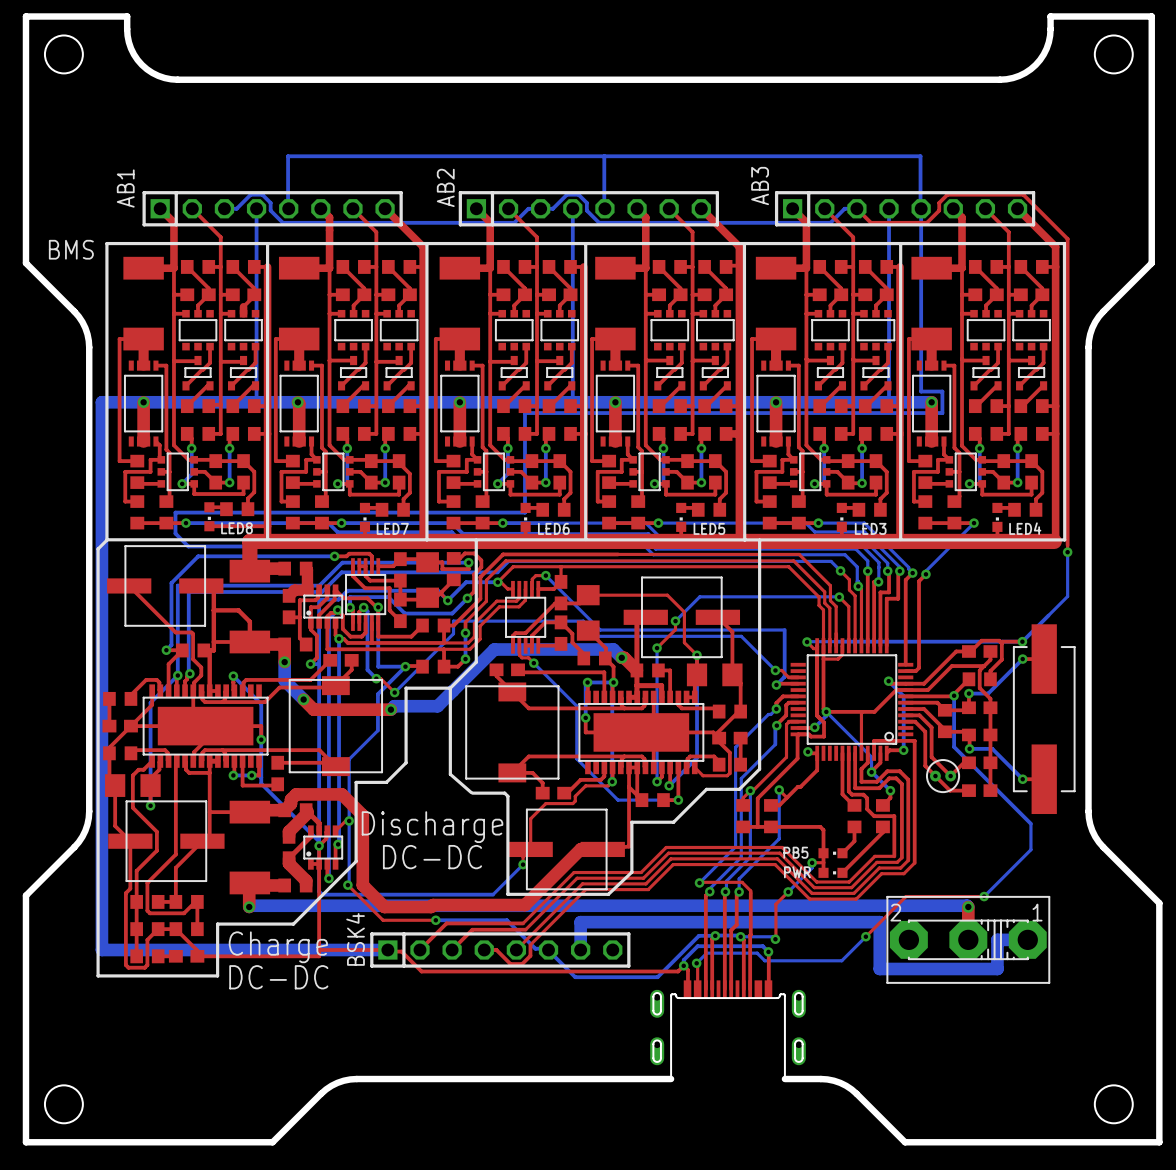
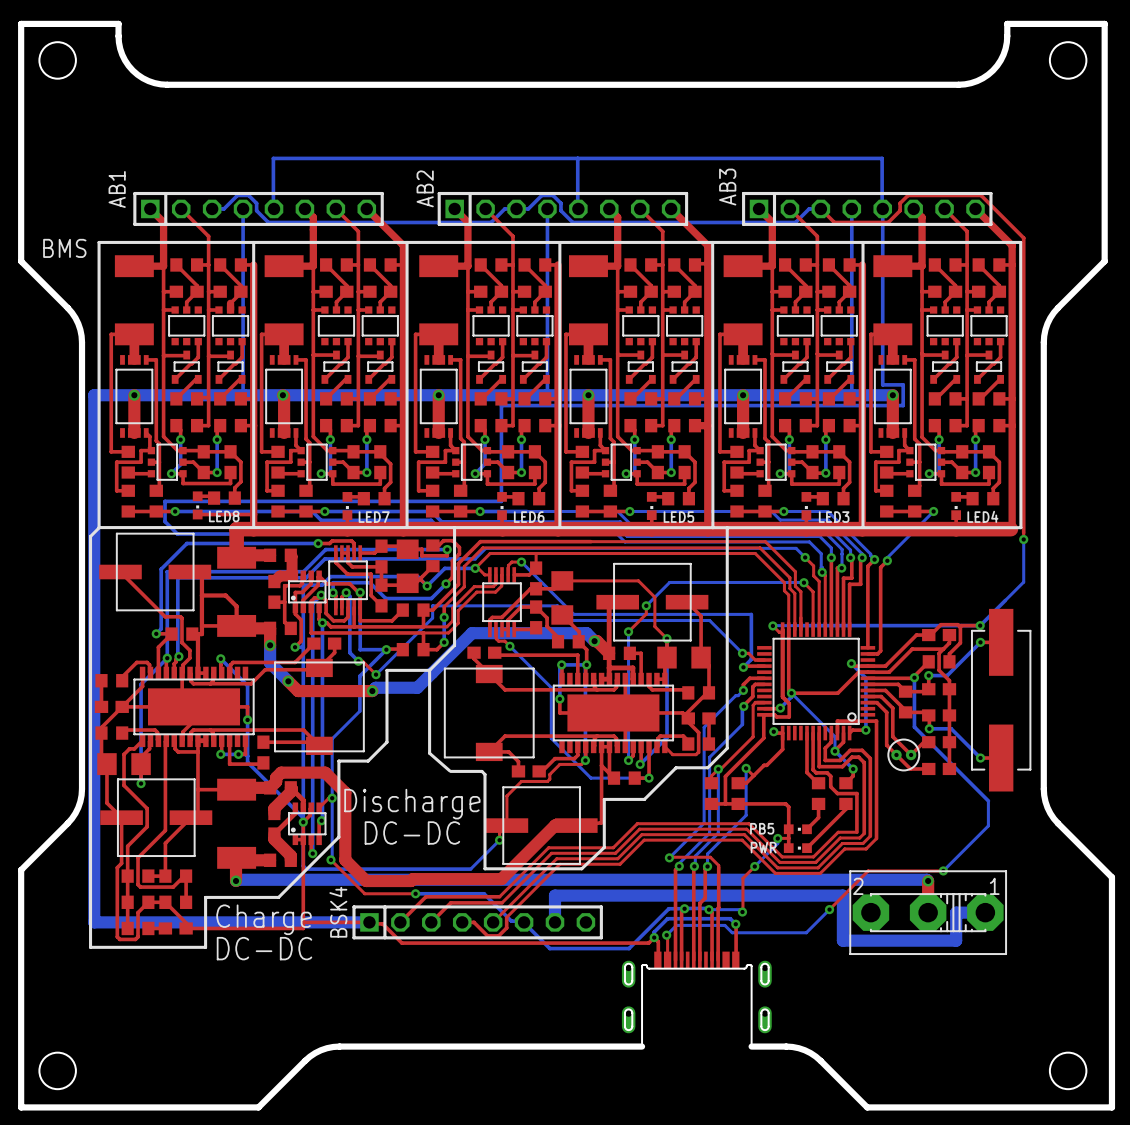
top track: (842, 645) (842, 655) (838, 659) (823, 659) -> none
top track: (862, 711) (861, 753) -> none

